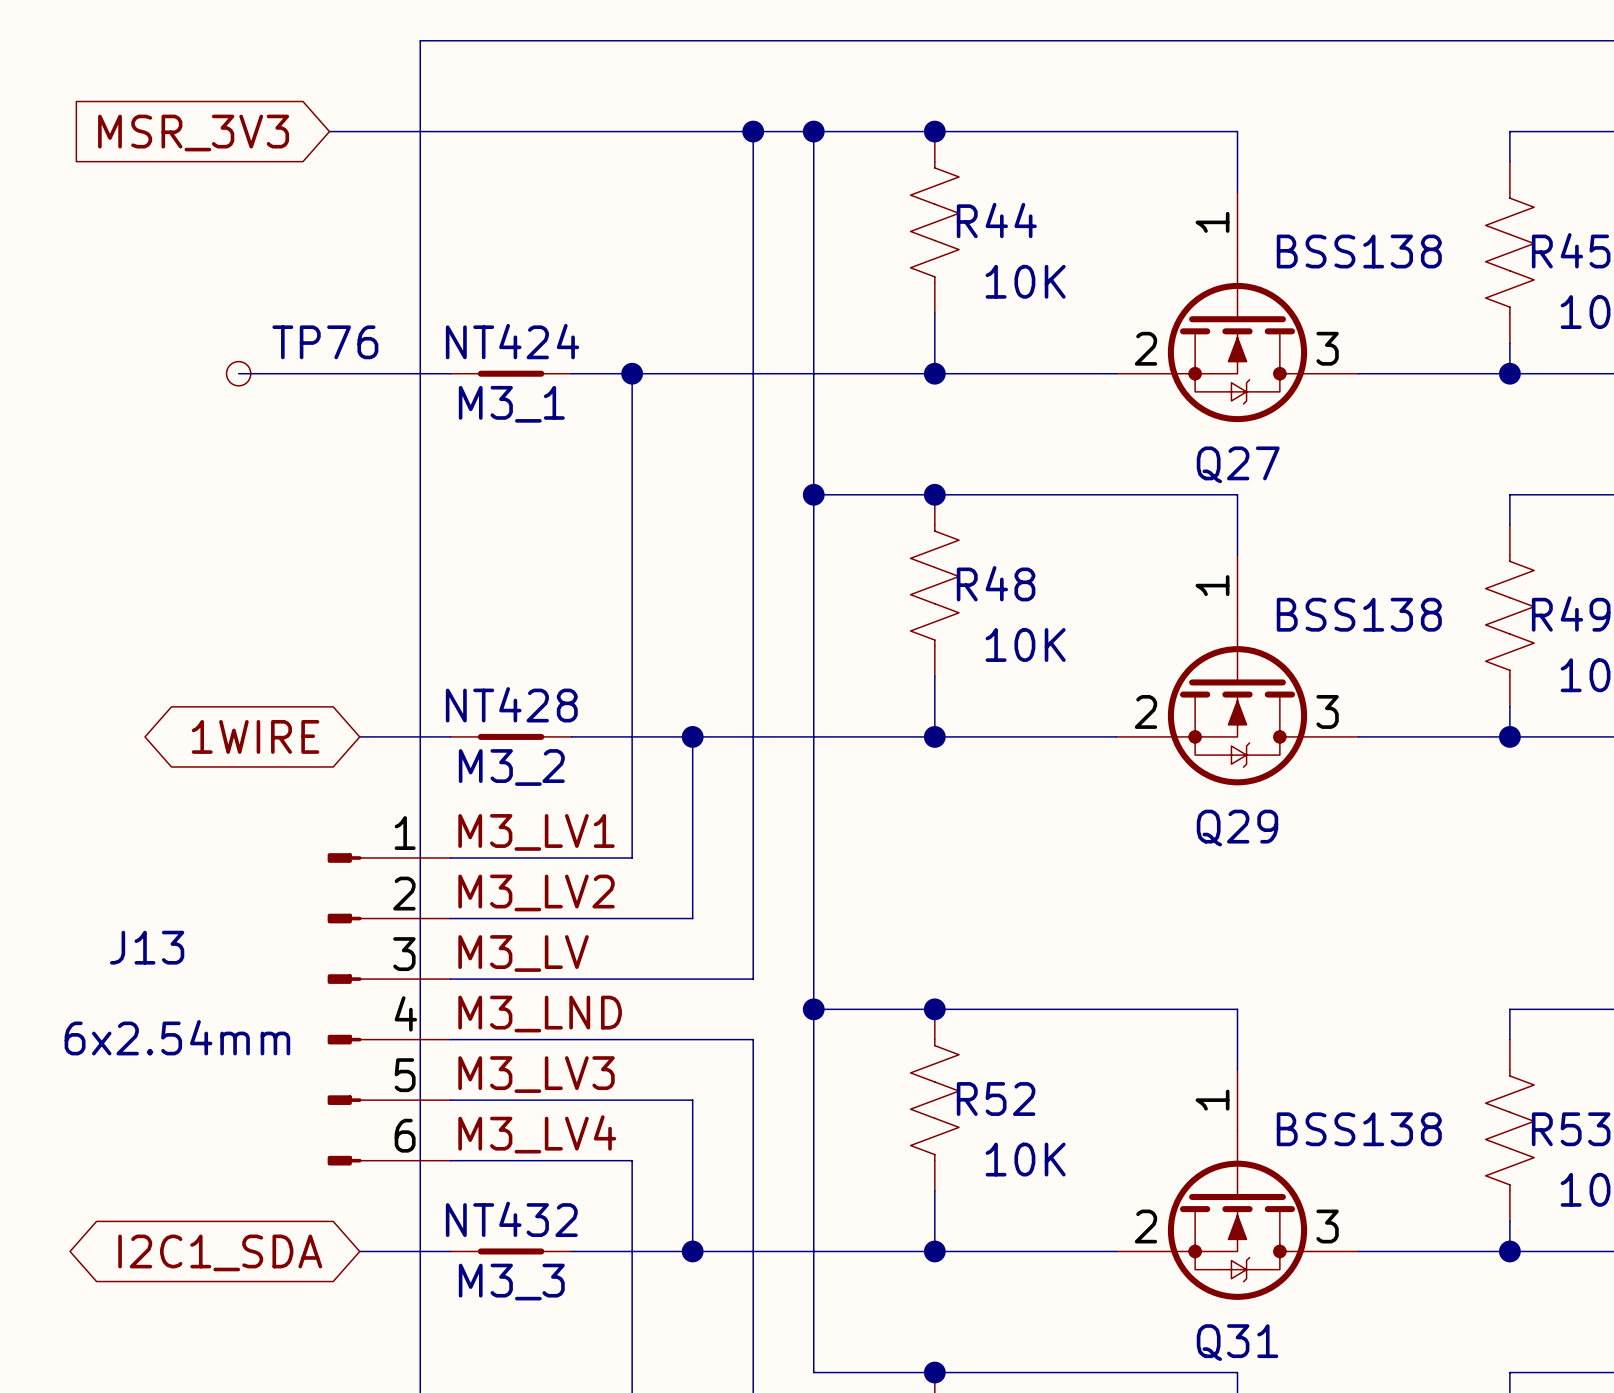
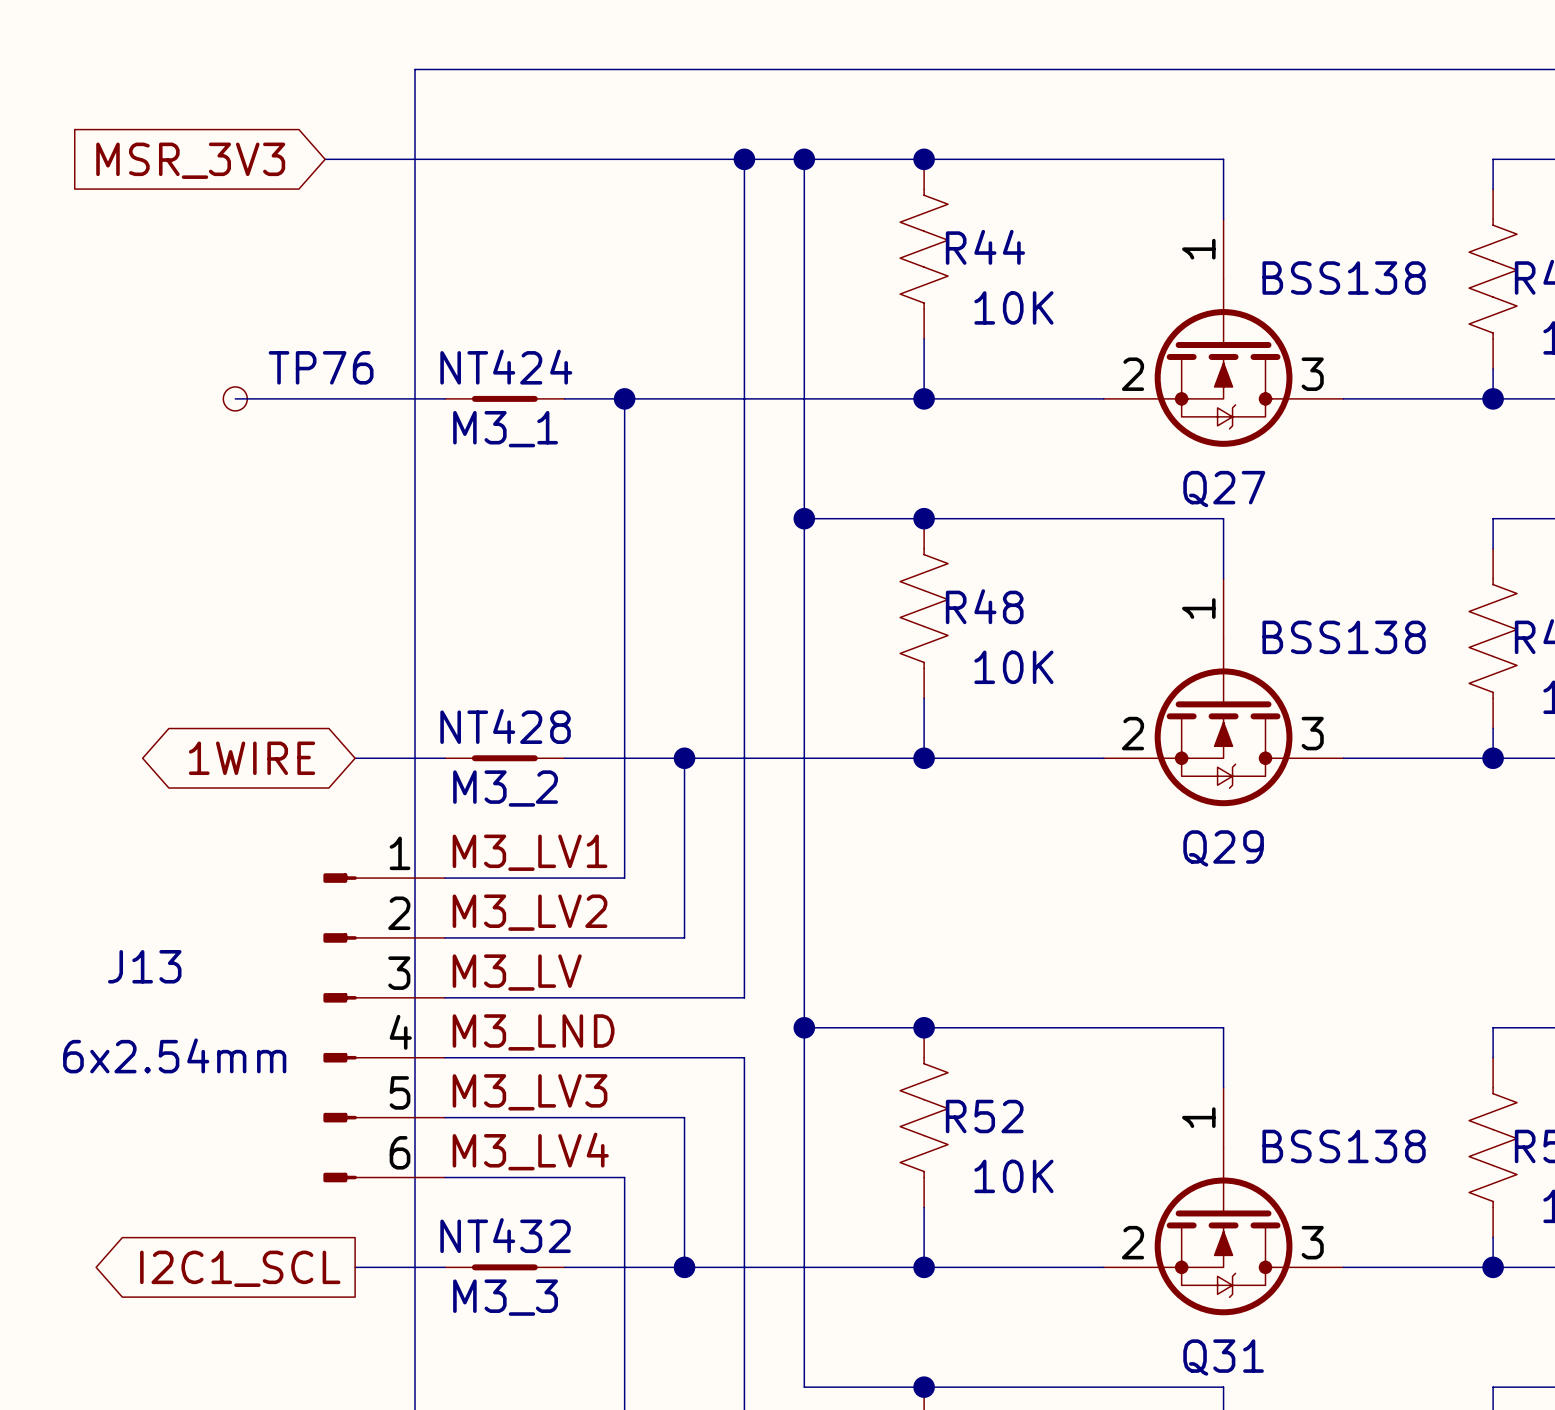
global label shape: bidirectional (220, 1252) -> output (240, 1268)
global label: I2C1_SDA (220, 1252) -> I2C1_SCL (240, 1268)

